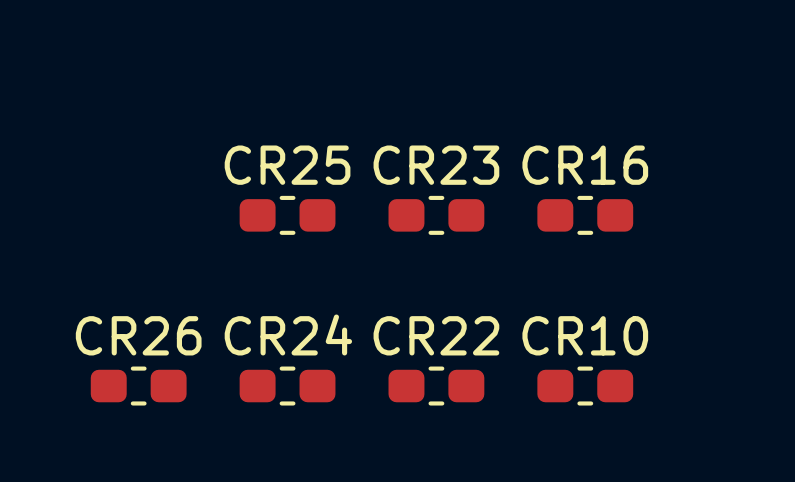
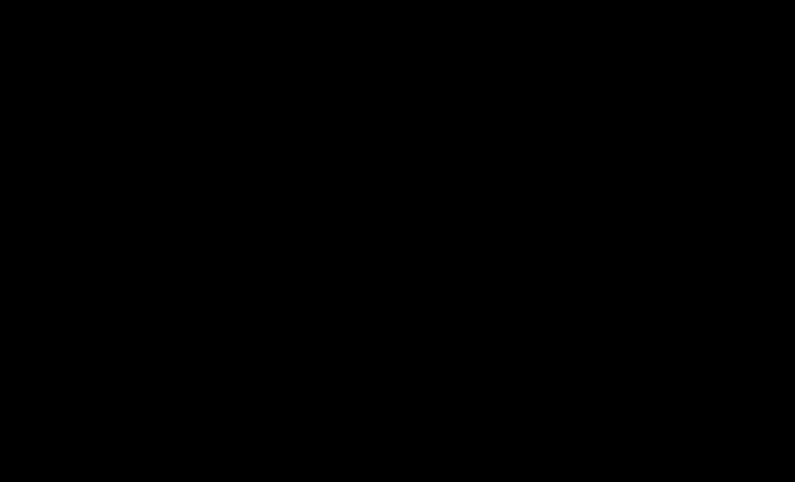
CR25: (287, 215) -> none
CR23: (436, 215) -> none
CR16: (585, 215) -> none
CR26: (138, 386) -> none
CR24: (287, 386) -> none
CR22: (436, 386) -> none
CR10: (585, 386) -> none

